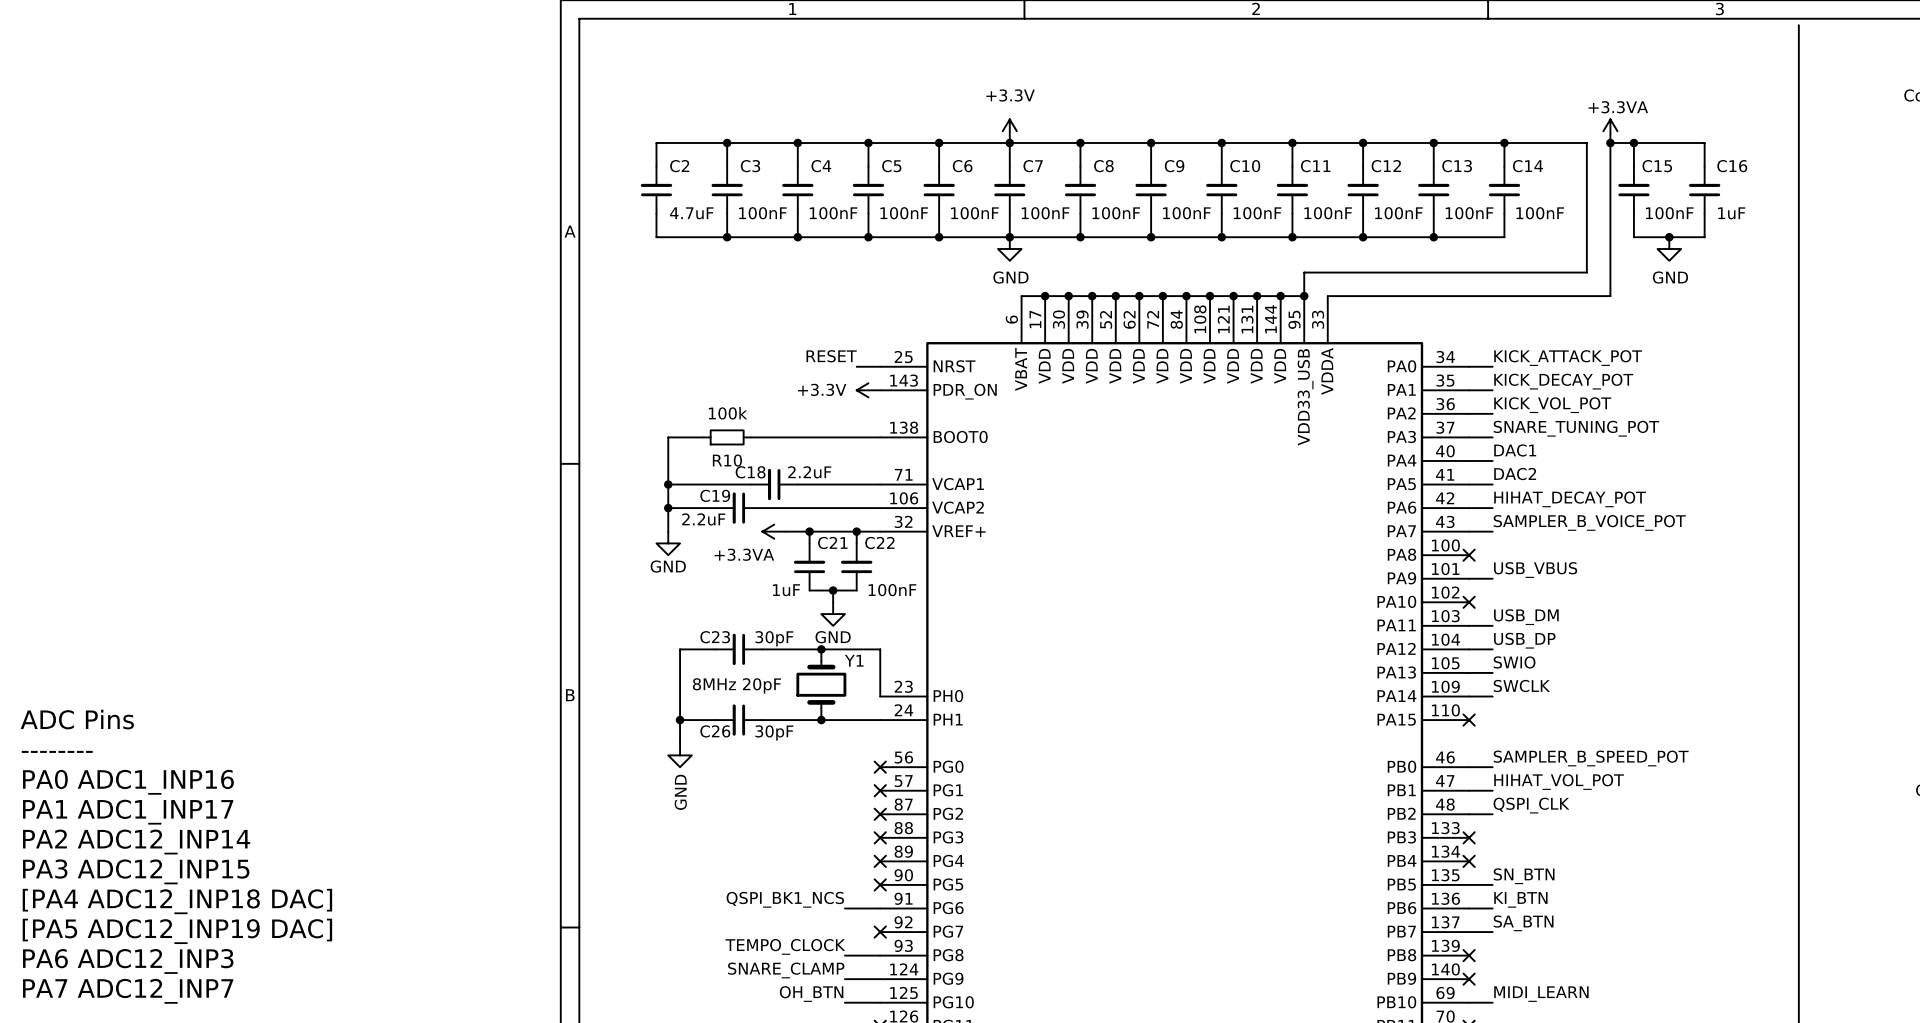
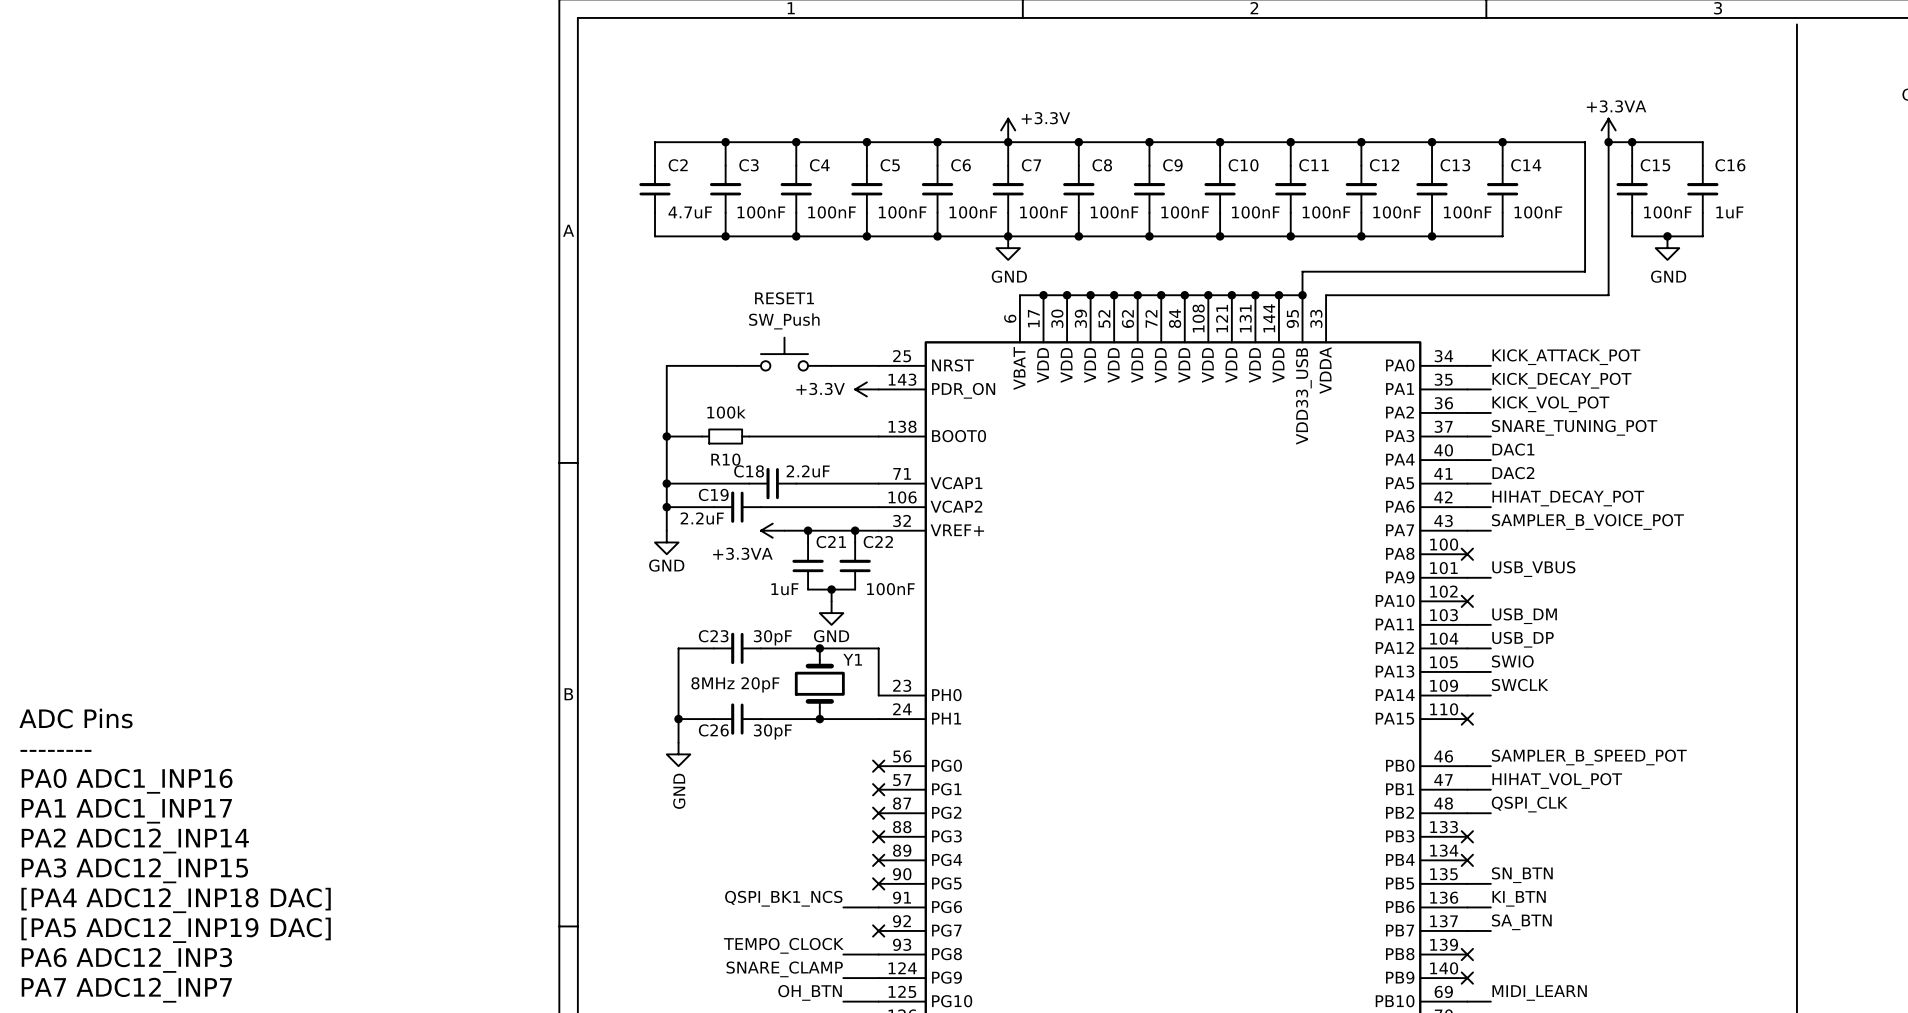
power symbol text position: +3.3V (1010, 95) -> +3.3V (1045, 118)
RESET1: none -> SW_Push (784, 354)
label: RESET (831, 356) -> none
wire: none -> (737, 365) (666, 365) (666, 436)
wire: none -> (831, 365) (855, 365)
junction: none -> (666, 436)

